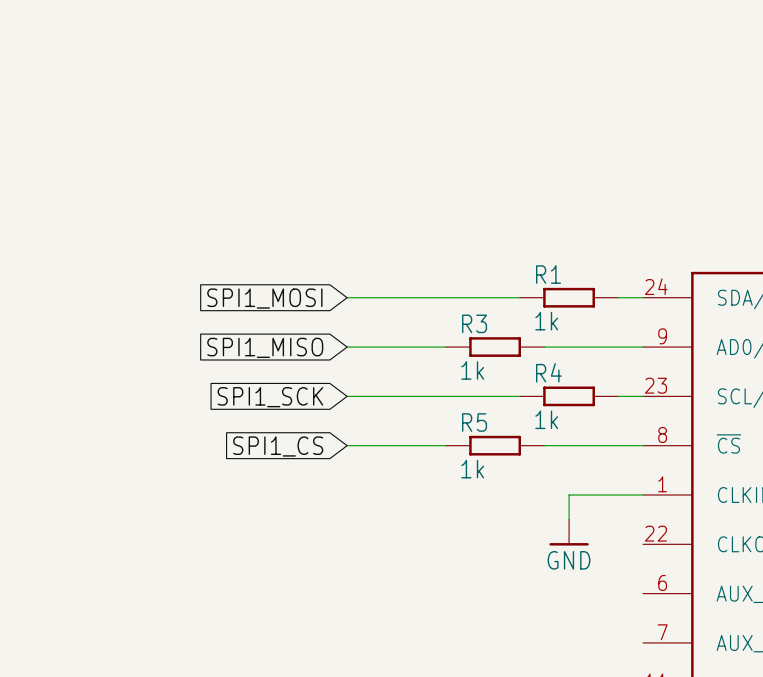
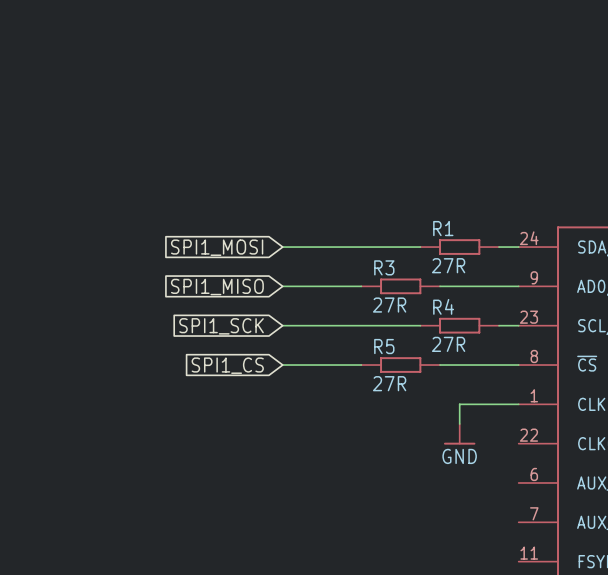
R1 value: 1k (546, 321) -> 27R (448, 265)
R3 value: 1k (472, 370) -> 27R (389, 305)
R4 value: 1k (546, 419) -> 27R (448, 344)
R5 value: 1k (472, 469) -> 27R (389, 383)

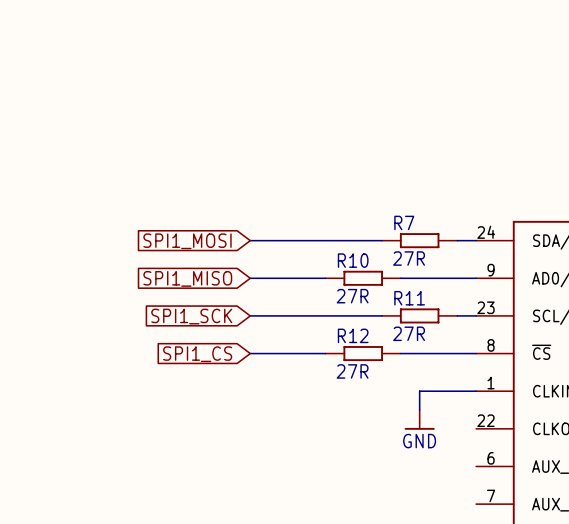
R1 name: R1 (443, 228) -> R7 (404, 222)
R3 name: R3 (384, 267) -> R10 (353, 260)
R4 name: R4 (443, 306) -> R11 (409, 298)
R5 name: R5 (384, 346) -> R12 (353, 335)

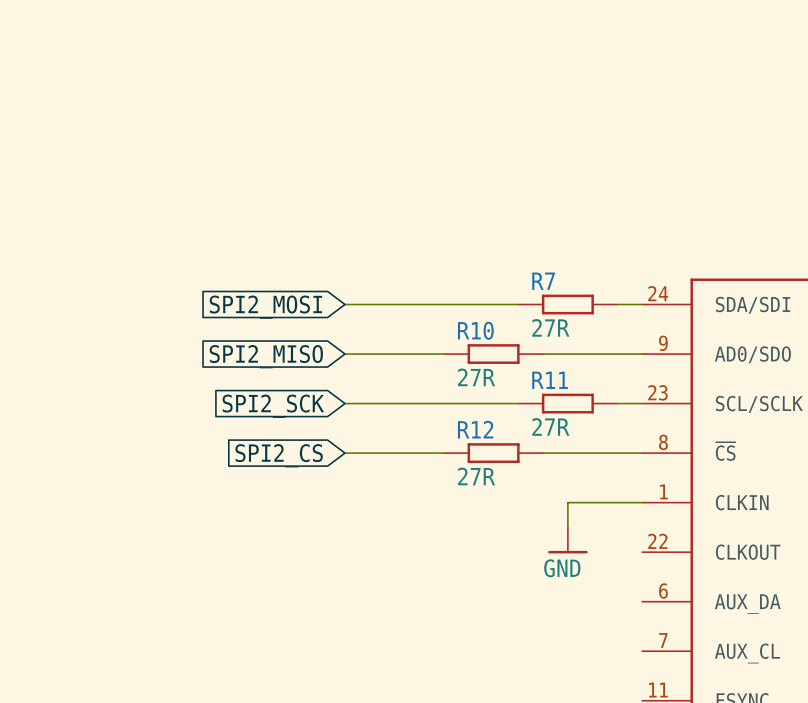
global label: SPI1_MOSI (187, 241) -> SPI2_MOSI (265, 307)
global label: SPI1_MISO (187, 278) -> SPI2_MISO (266, 356)
global label: SPI1_SCK (191, 316) -> SPI2_SCK (273, 406)
global label: SPI1_CS (197, 354) -> SPI2_CS (279, 455)

